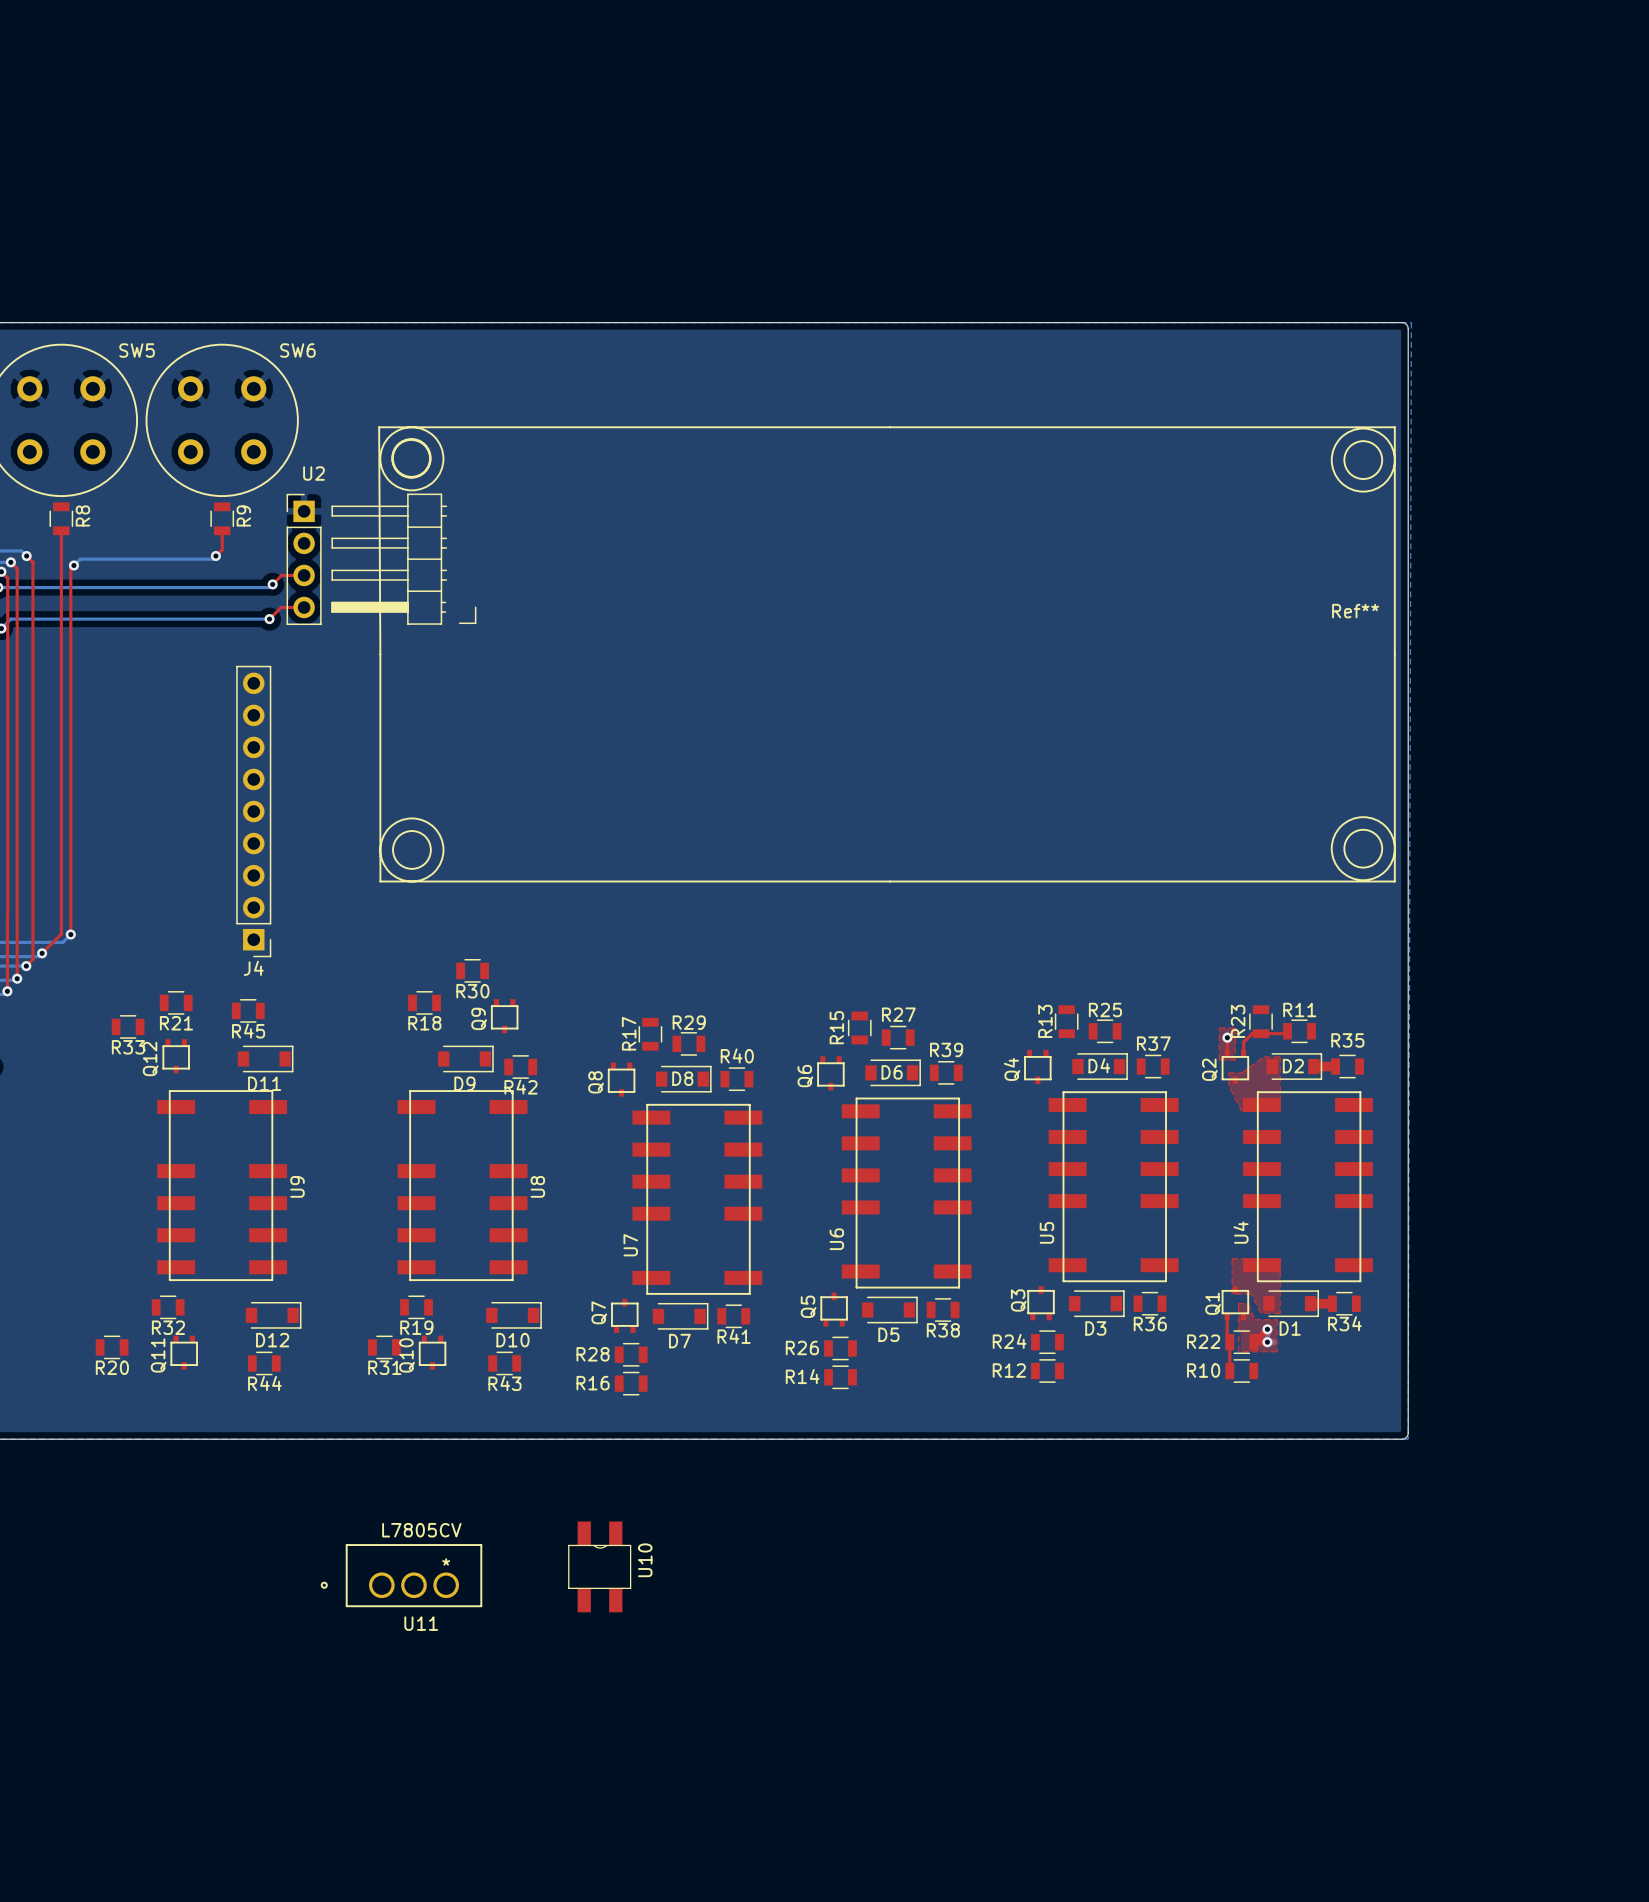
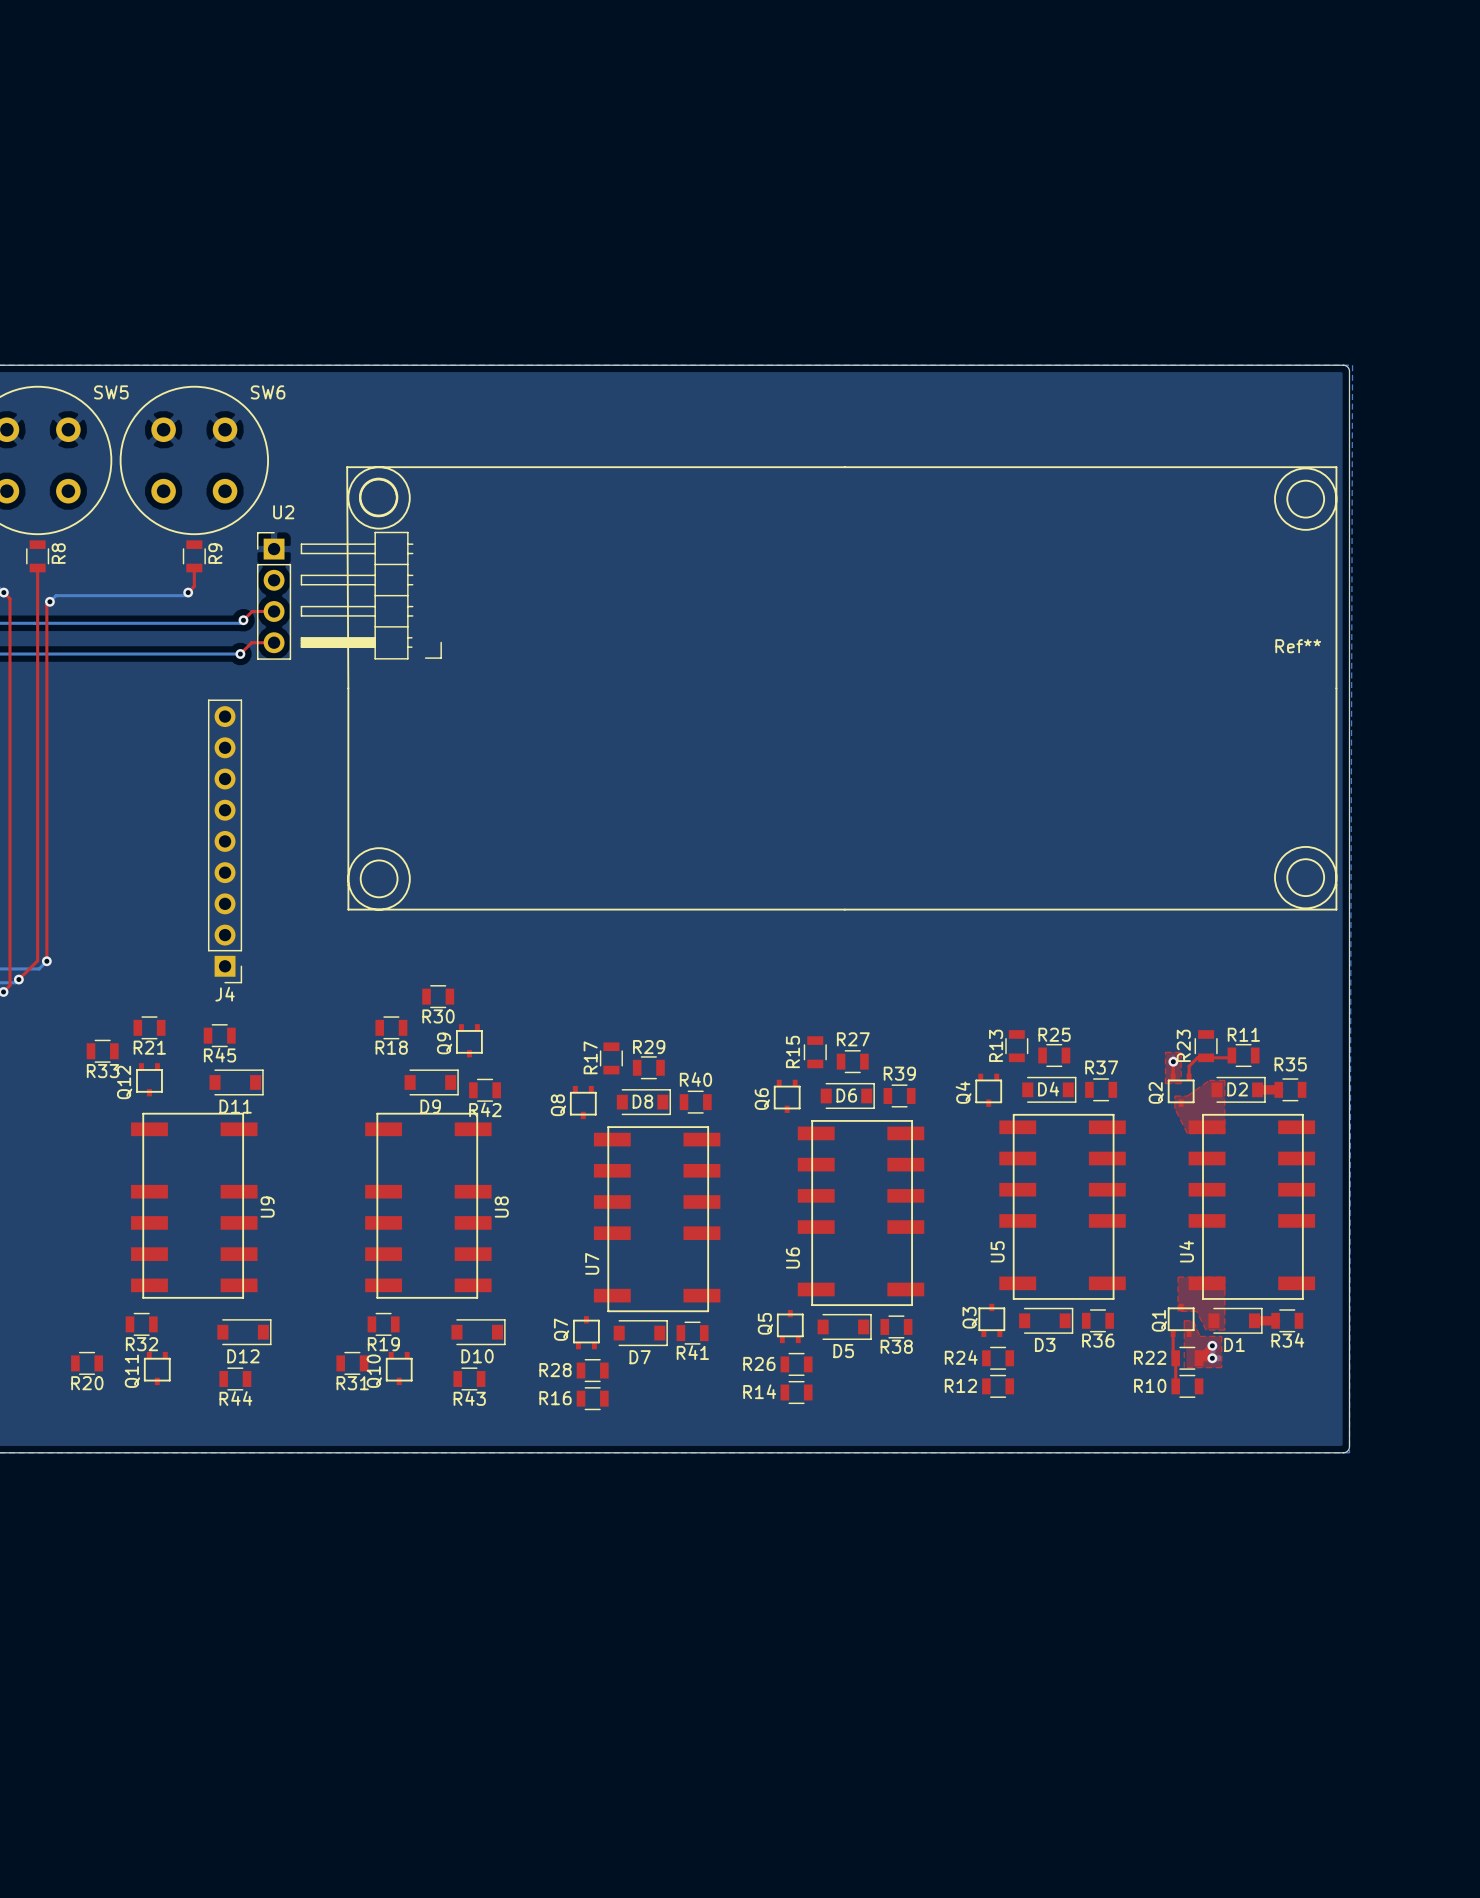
U10: (599, 1566) -> none
U11: L7805CV (401, 1575) -> none

